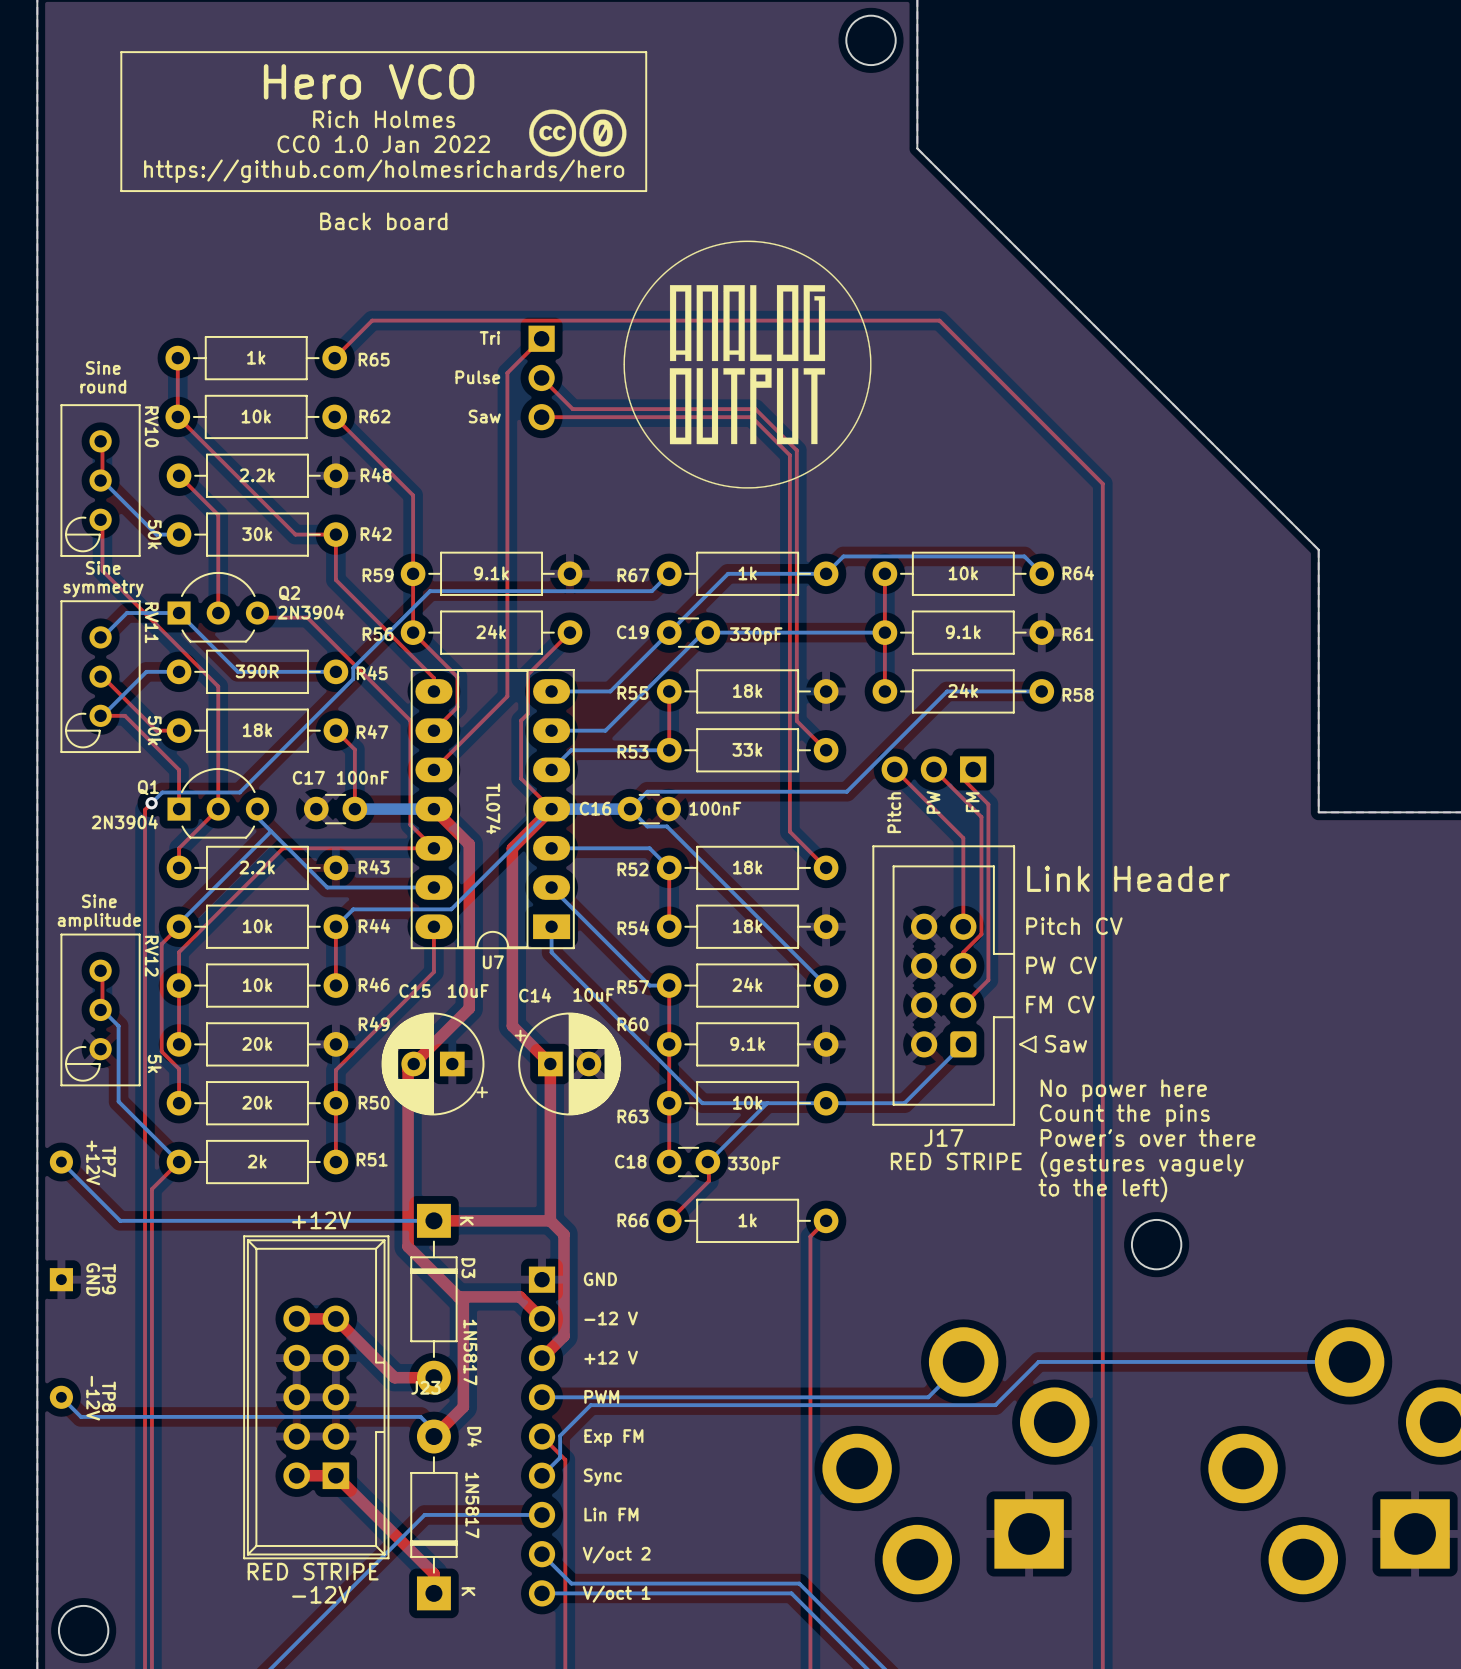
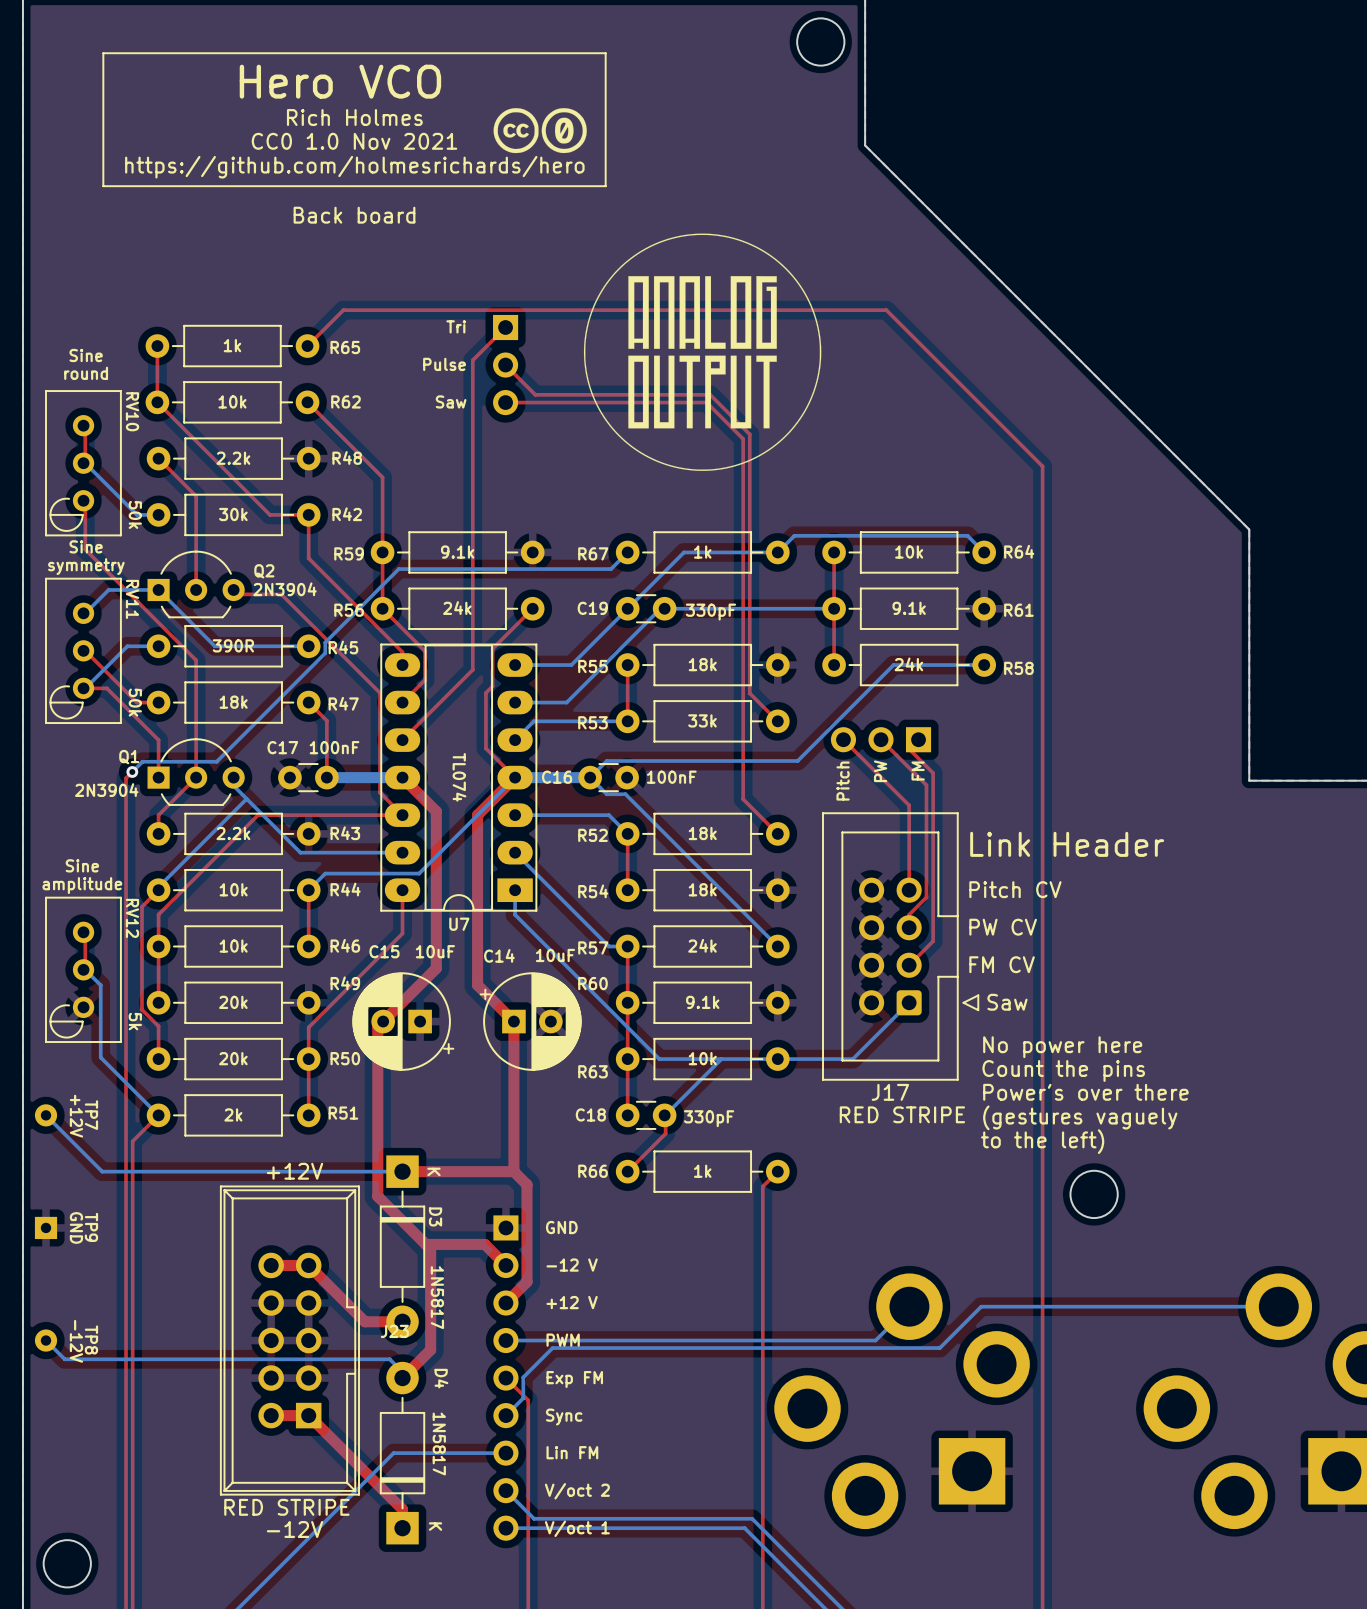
text: CC0 1.0 Jan 2022 (383, 144) -> CC0 1.0 Nov 2021 (354, 141)

